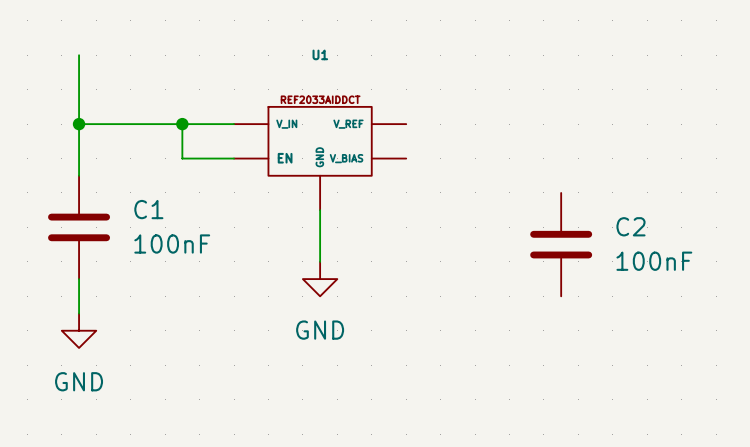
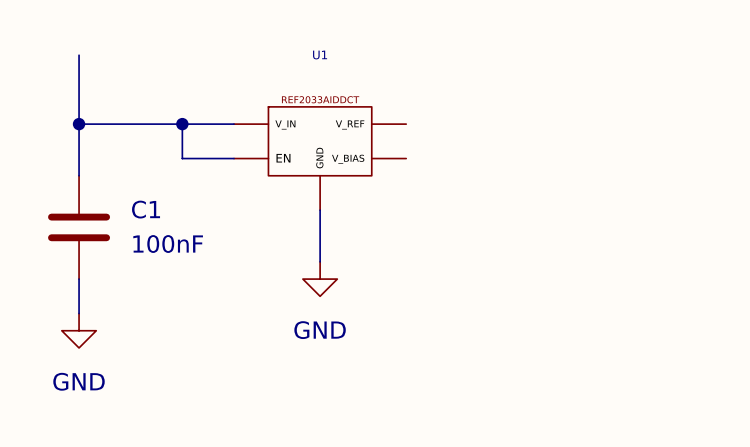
C2: 100nF (561, 244) -> none

